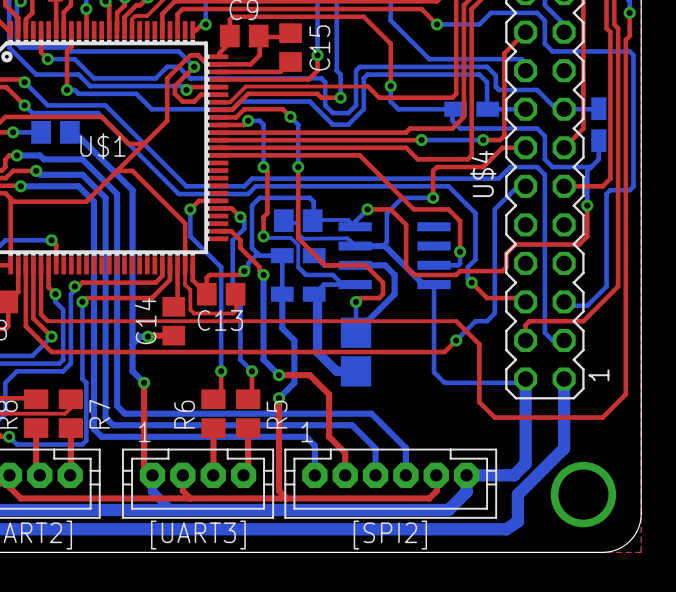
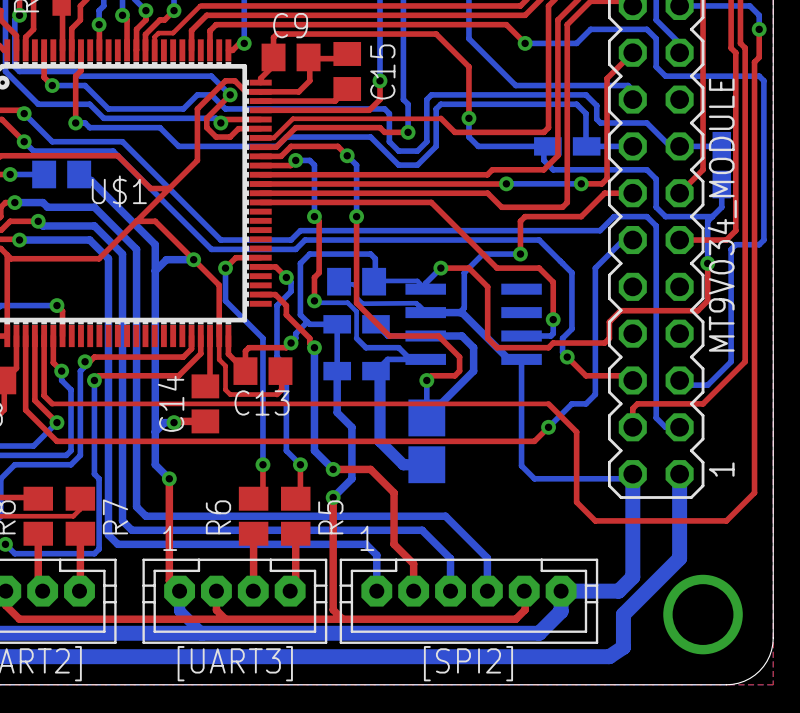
U$4 value: none -> MT9V034_MODULE (722, 215)
U$4 name: U$4 (483, 173) -> none
bottom track: none -> (193, 259) (166, 259) (155, 270)
via: none -> (193, 259)

